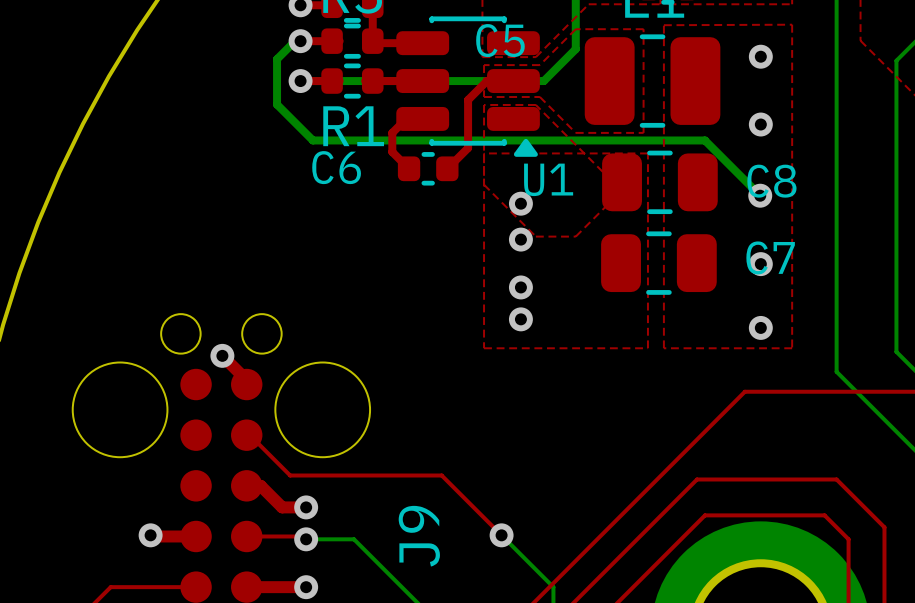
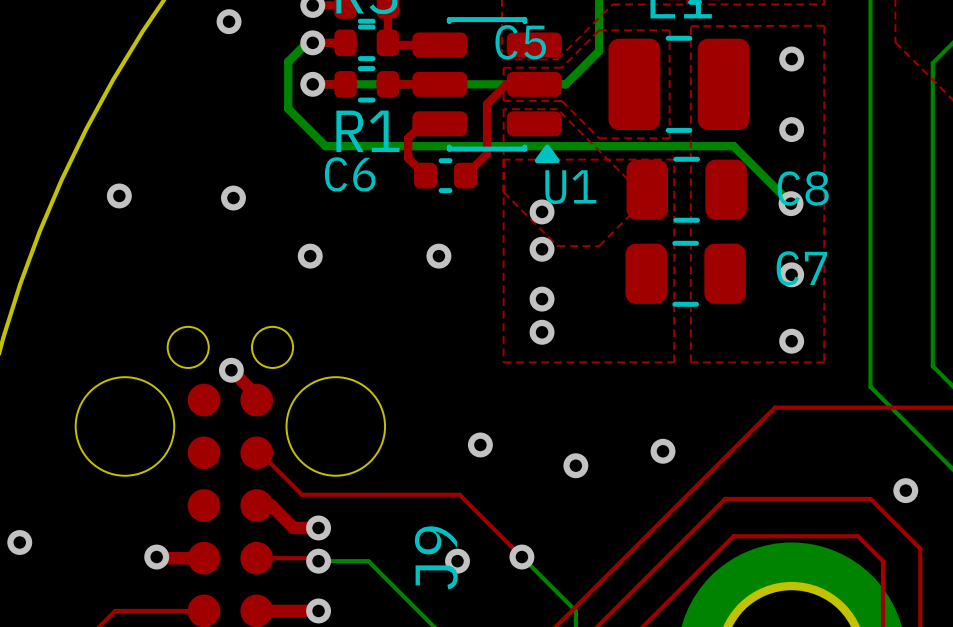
via: none -> (229, 21)
via: none -> (119, 195)
via: none -> (233, 198)
via: none -> (310, 256)
via: none -> (438, 256)
via: none -> (480, 444)
via: none -> (663, 451)
via: none -> (575, 465)
via: none -> (905, 490)
via: none -> (19, 542)
via: none -> (457, 561)

